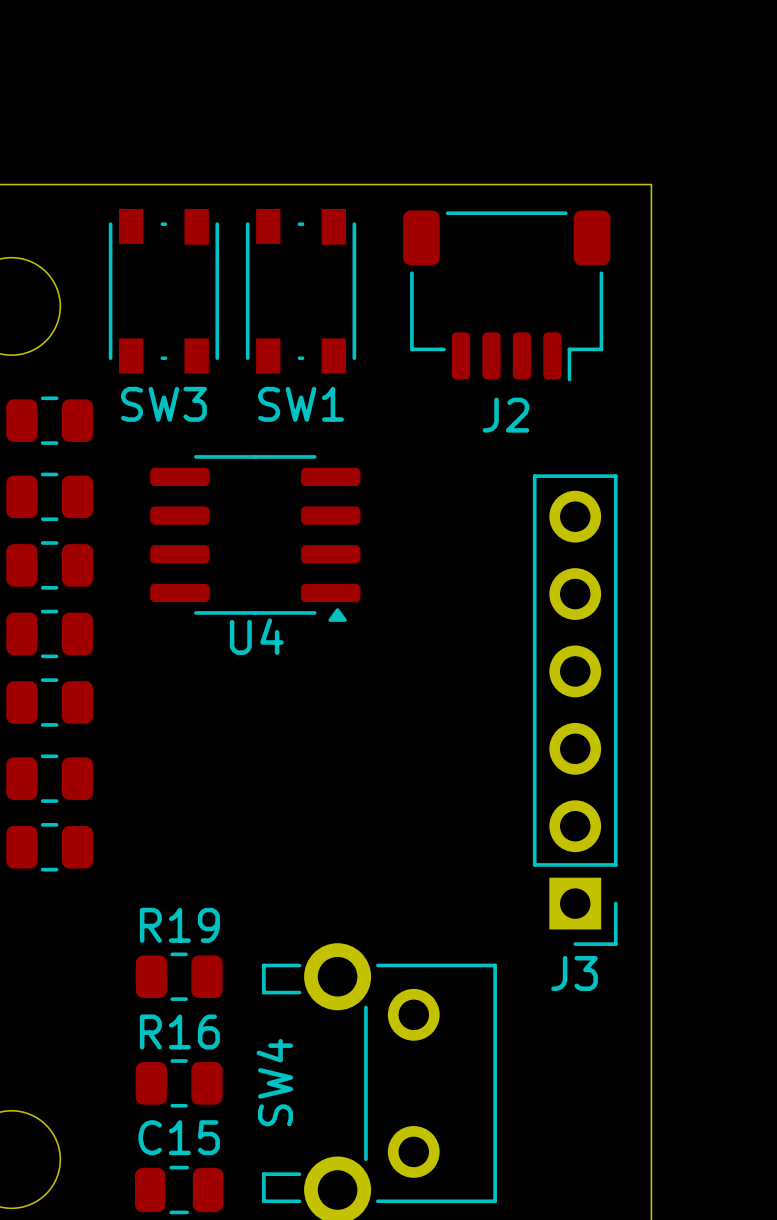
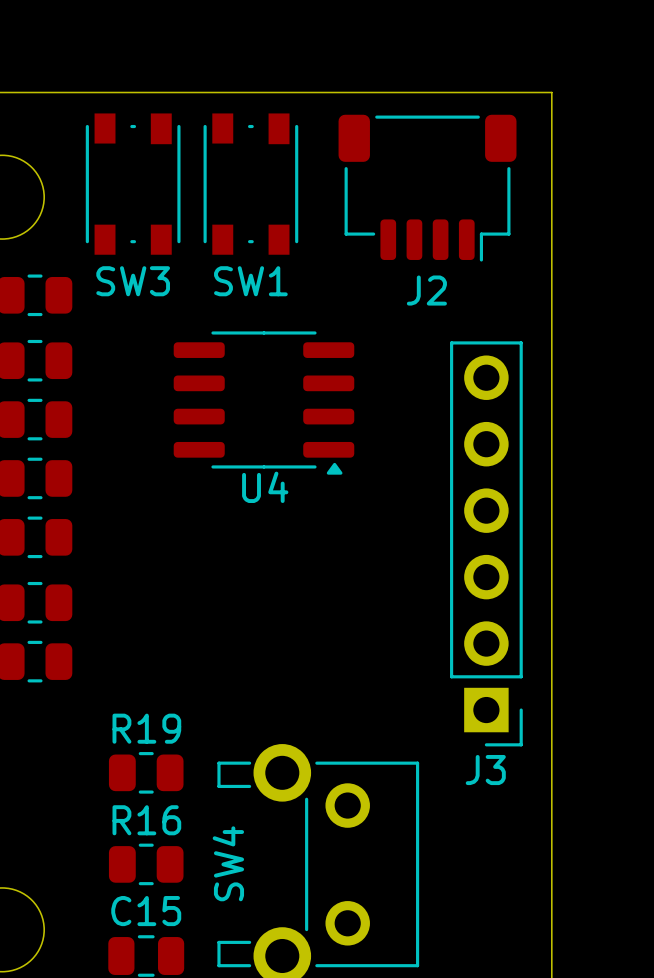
U4 position: (255, 538) -> (263, 403)

